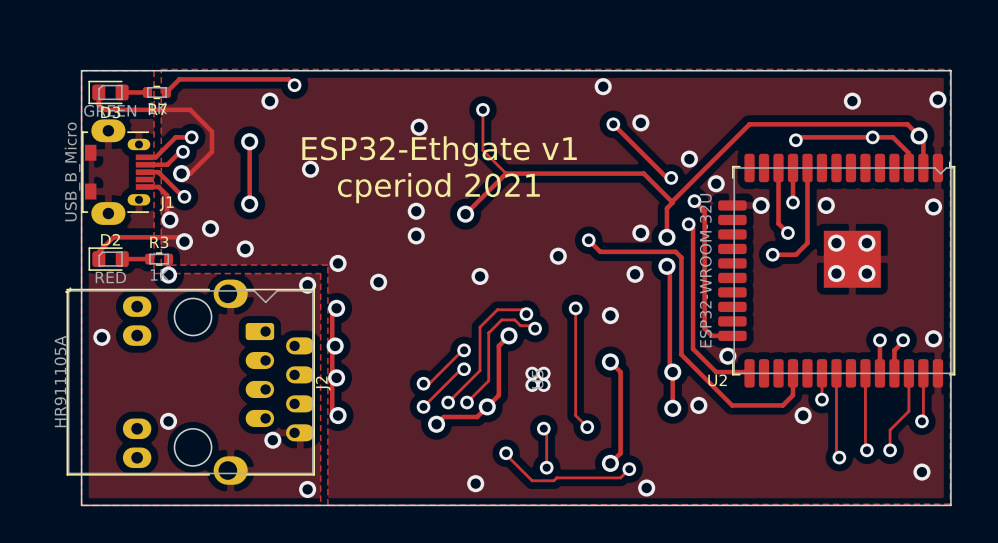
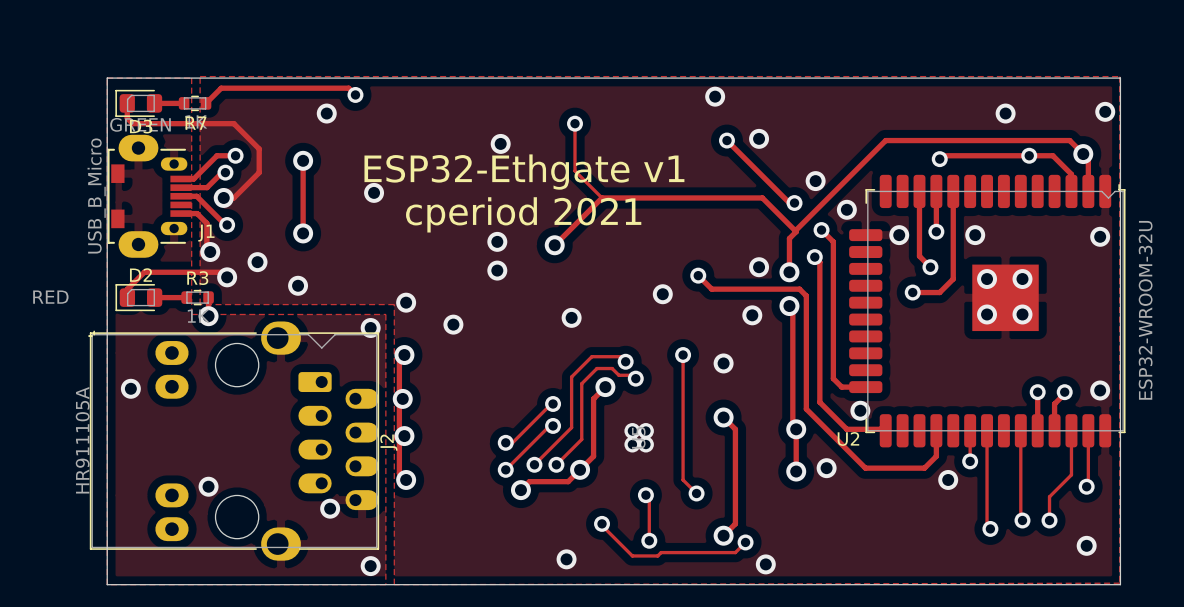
U2 value position: ESP32-WROOM-32U (705, 270) -> ESP32-WROOM-32U (1145, 310)
D2 value position: RED (110, 277) -> RED (50, 297)

